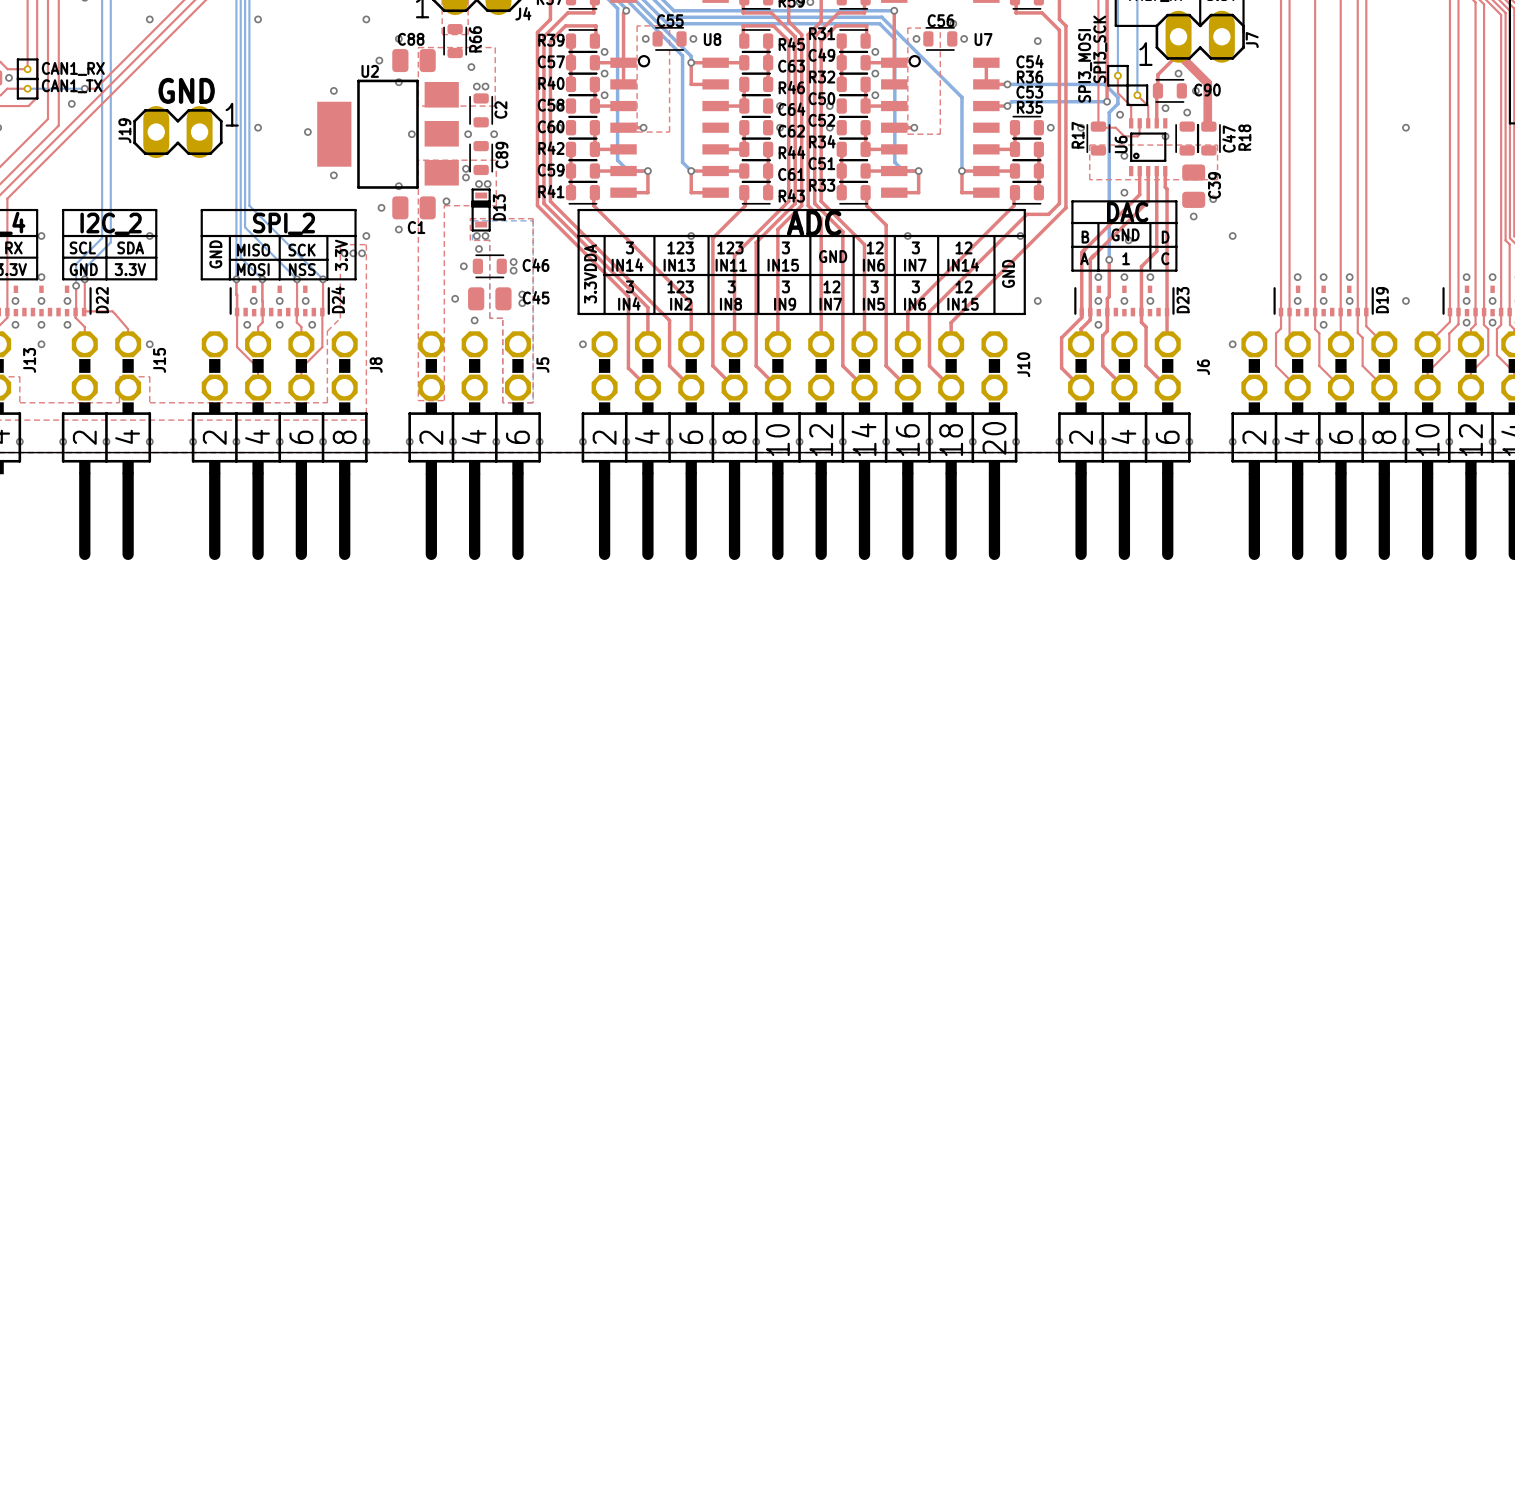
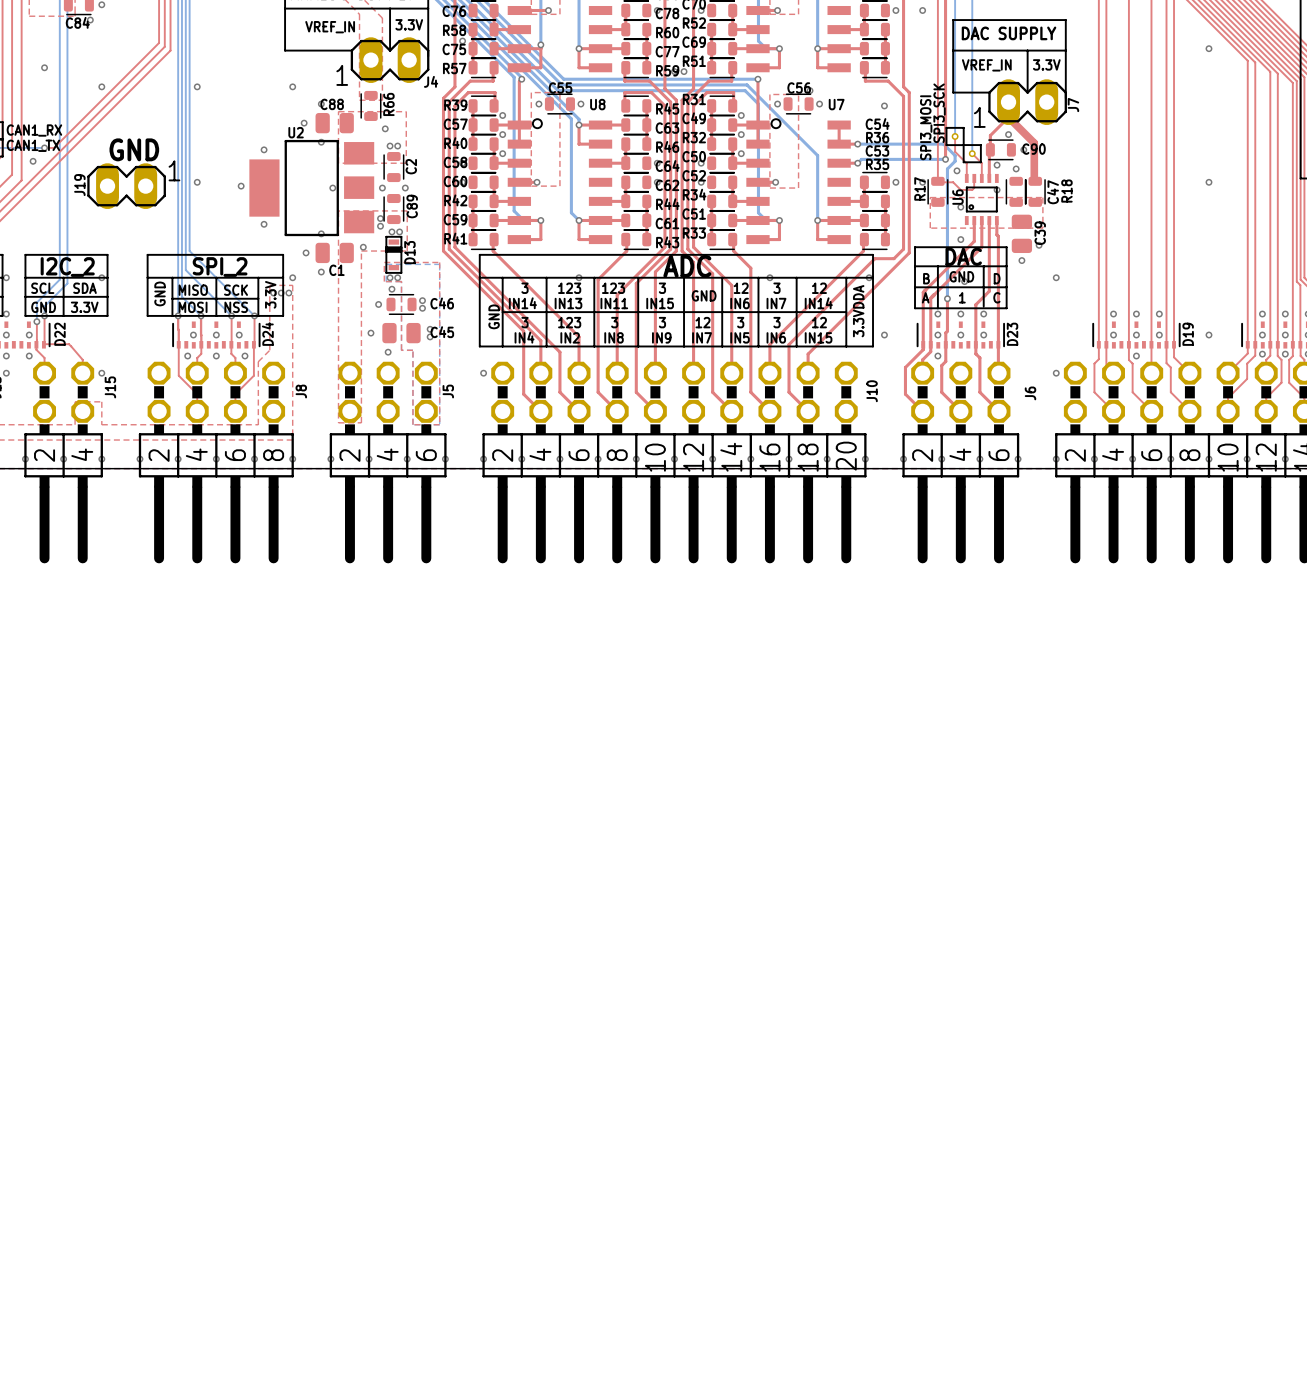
text: 3.3VDDA (590, 273) -> GND (494, 316)
text: GND (1008, 273) -> 3.3VDDA (858, 311)

